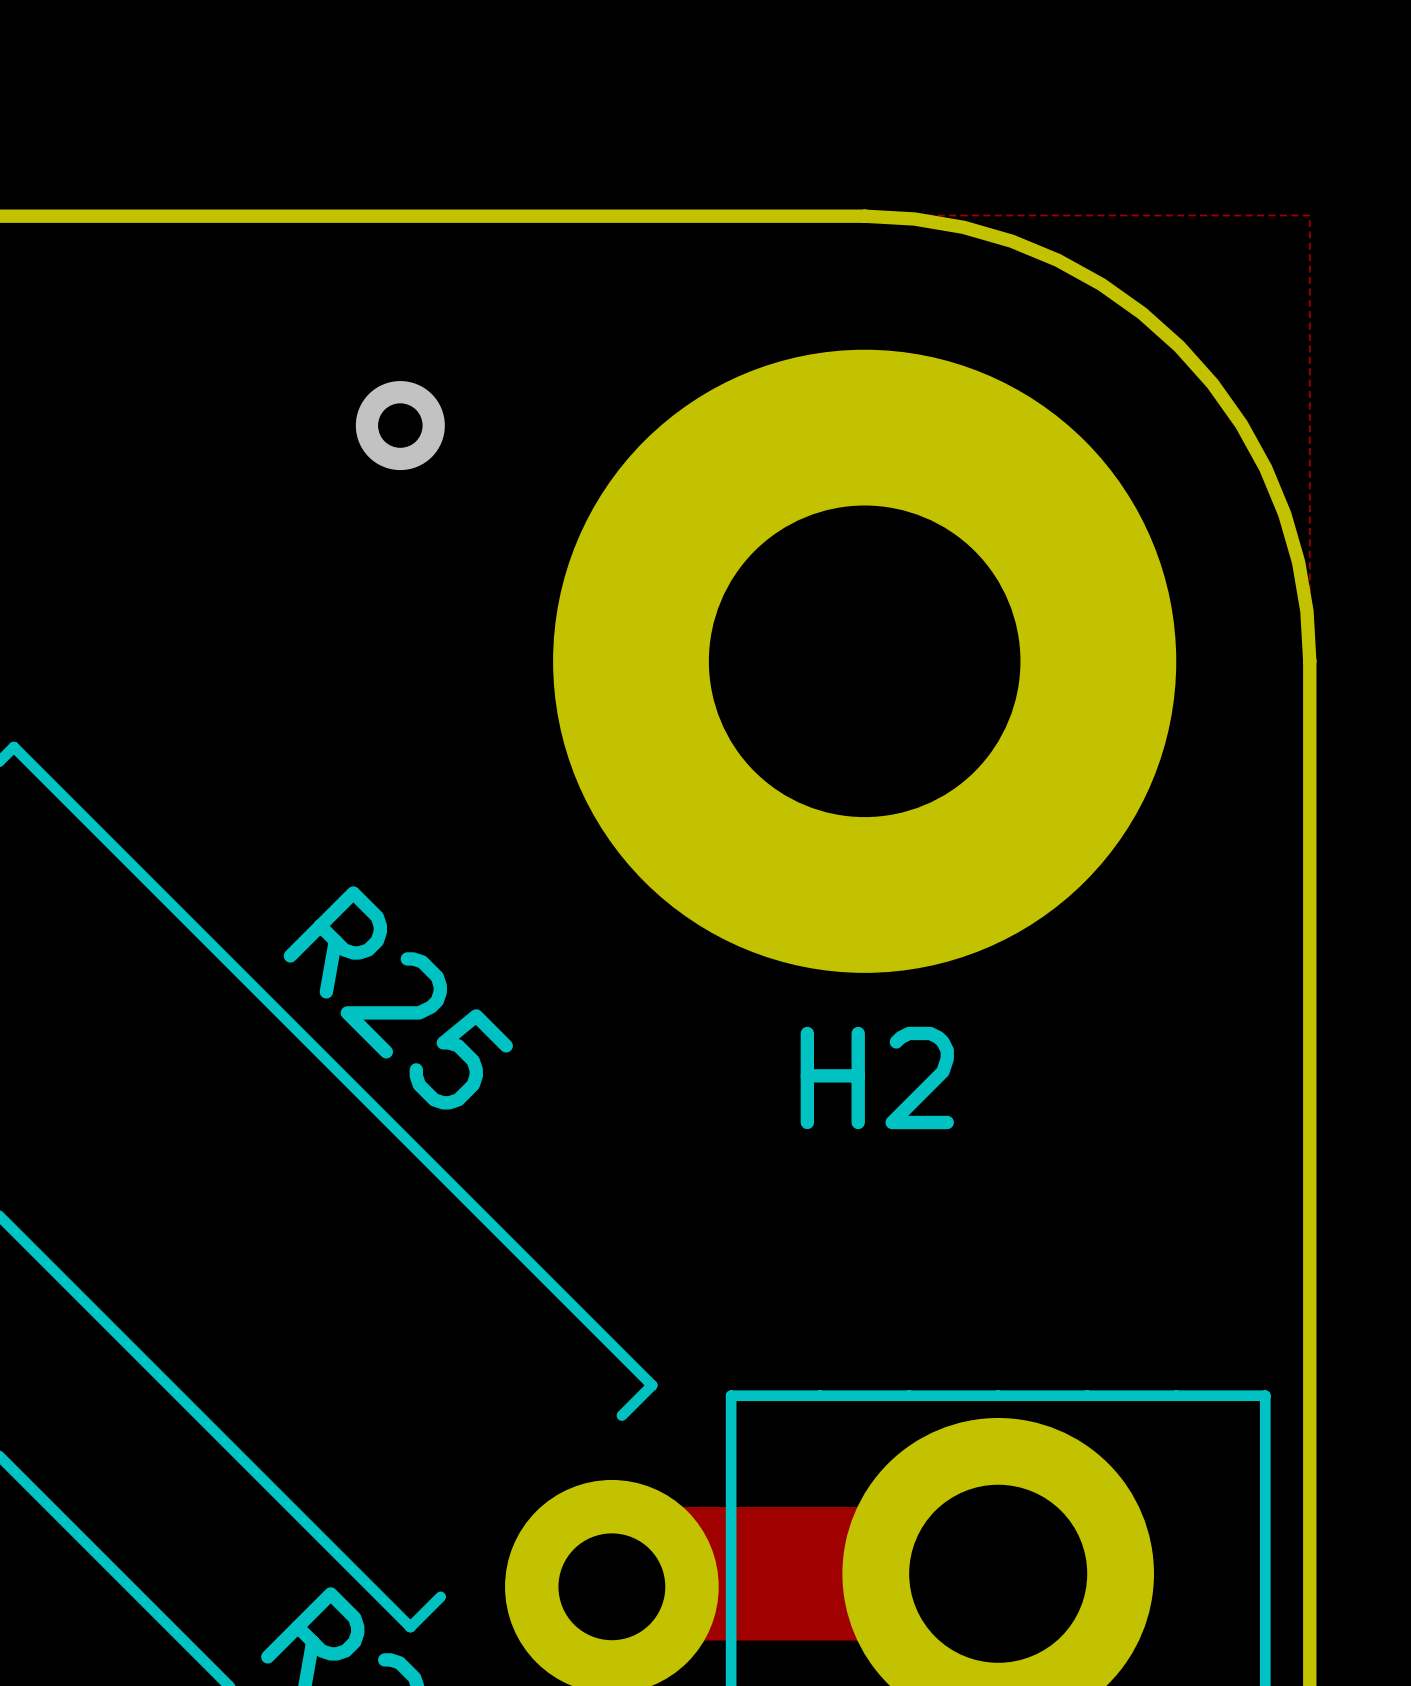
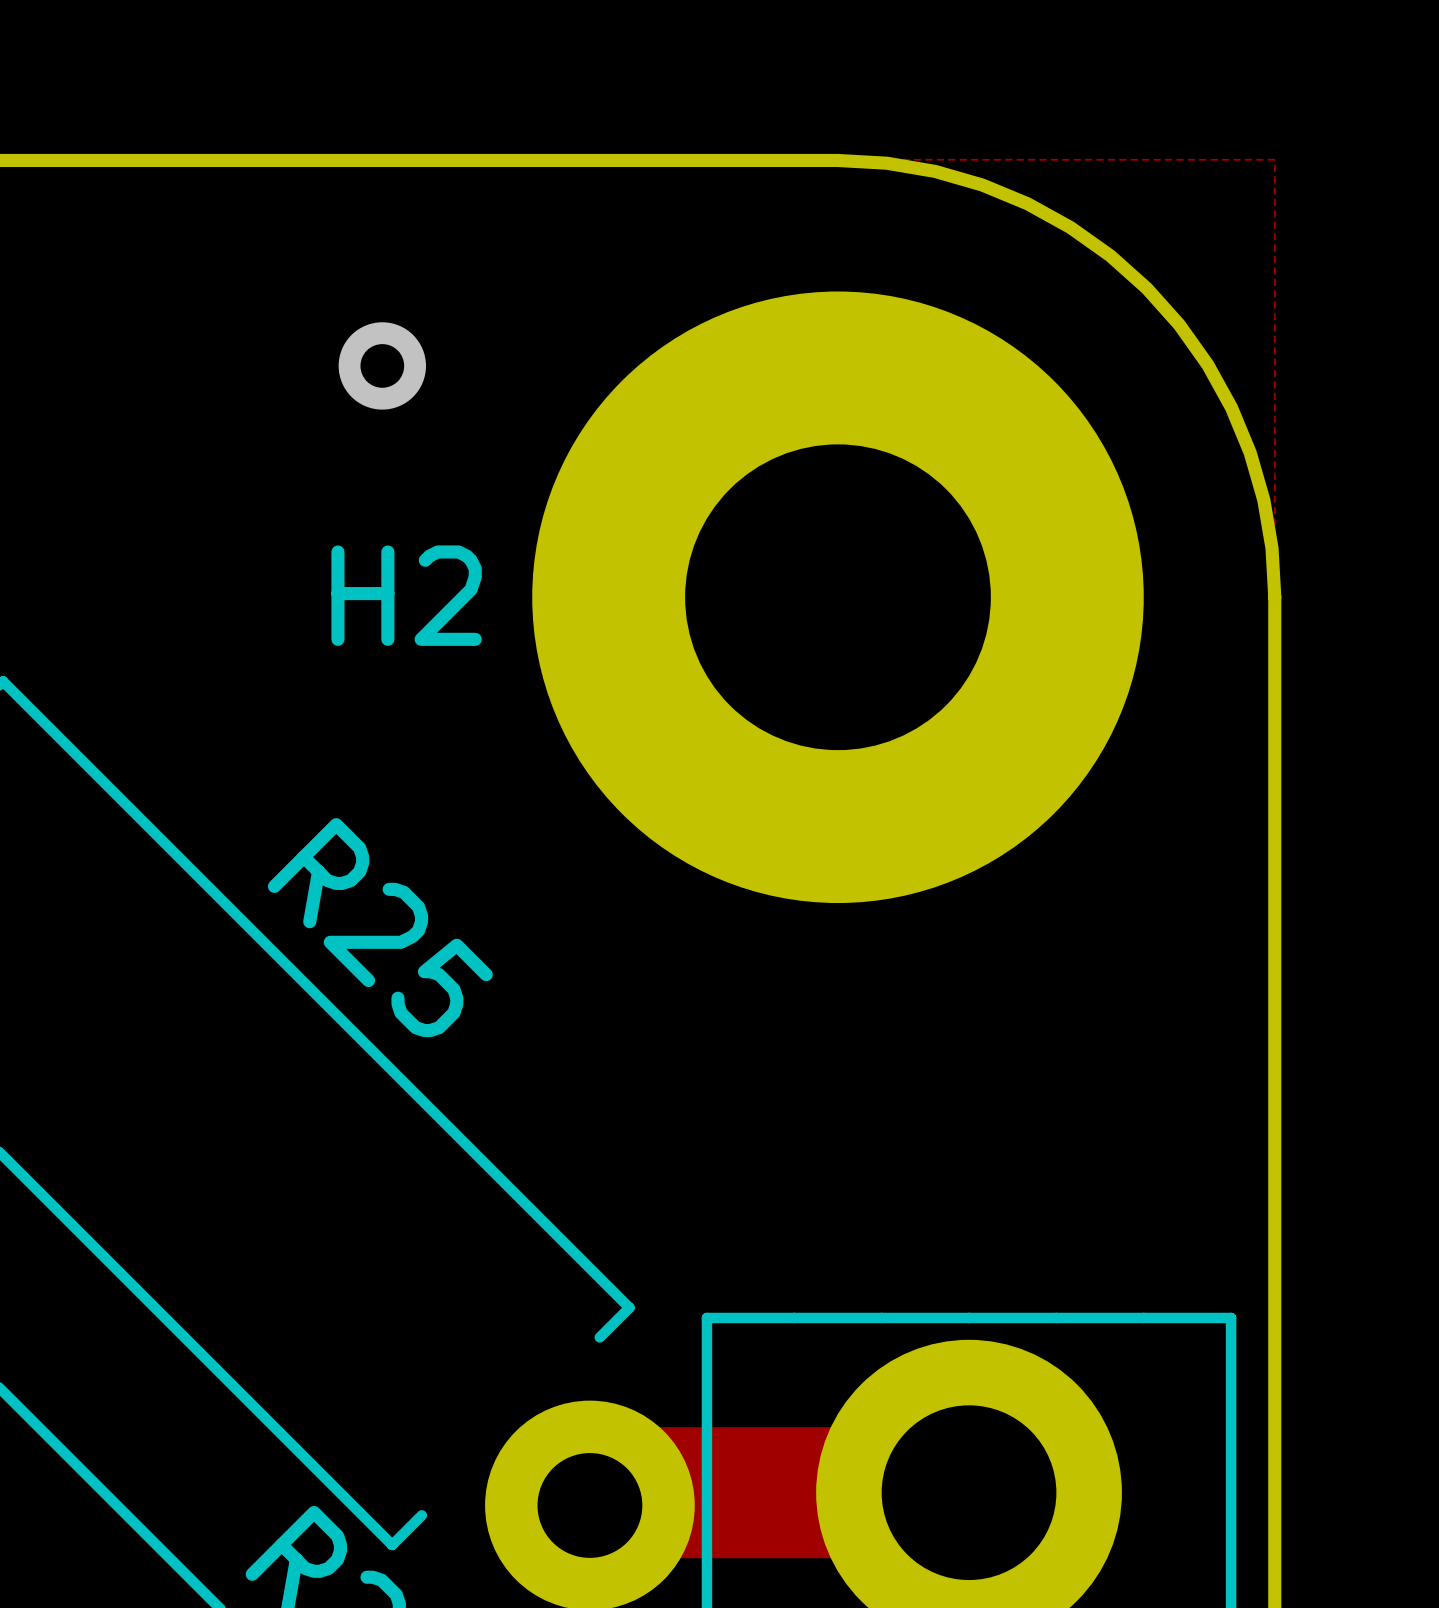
H2 name position: H2 (877, 1077) -> H2 (406, 595)

